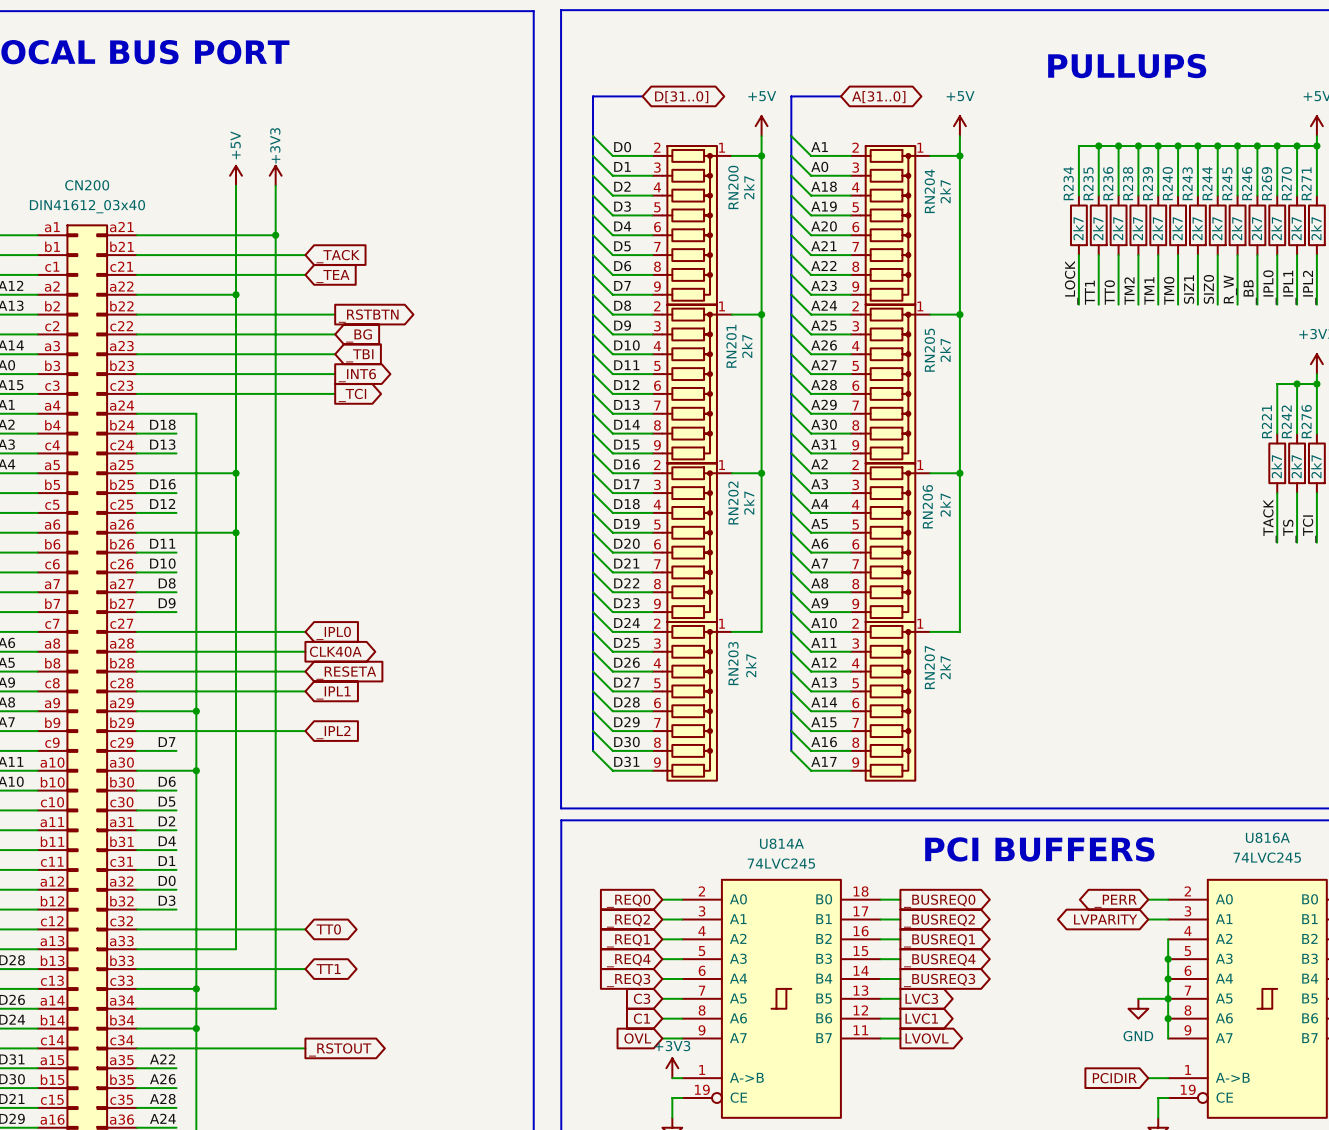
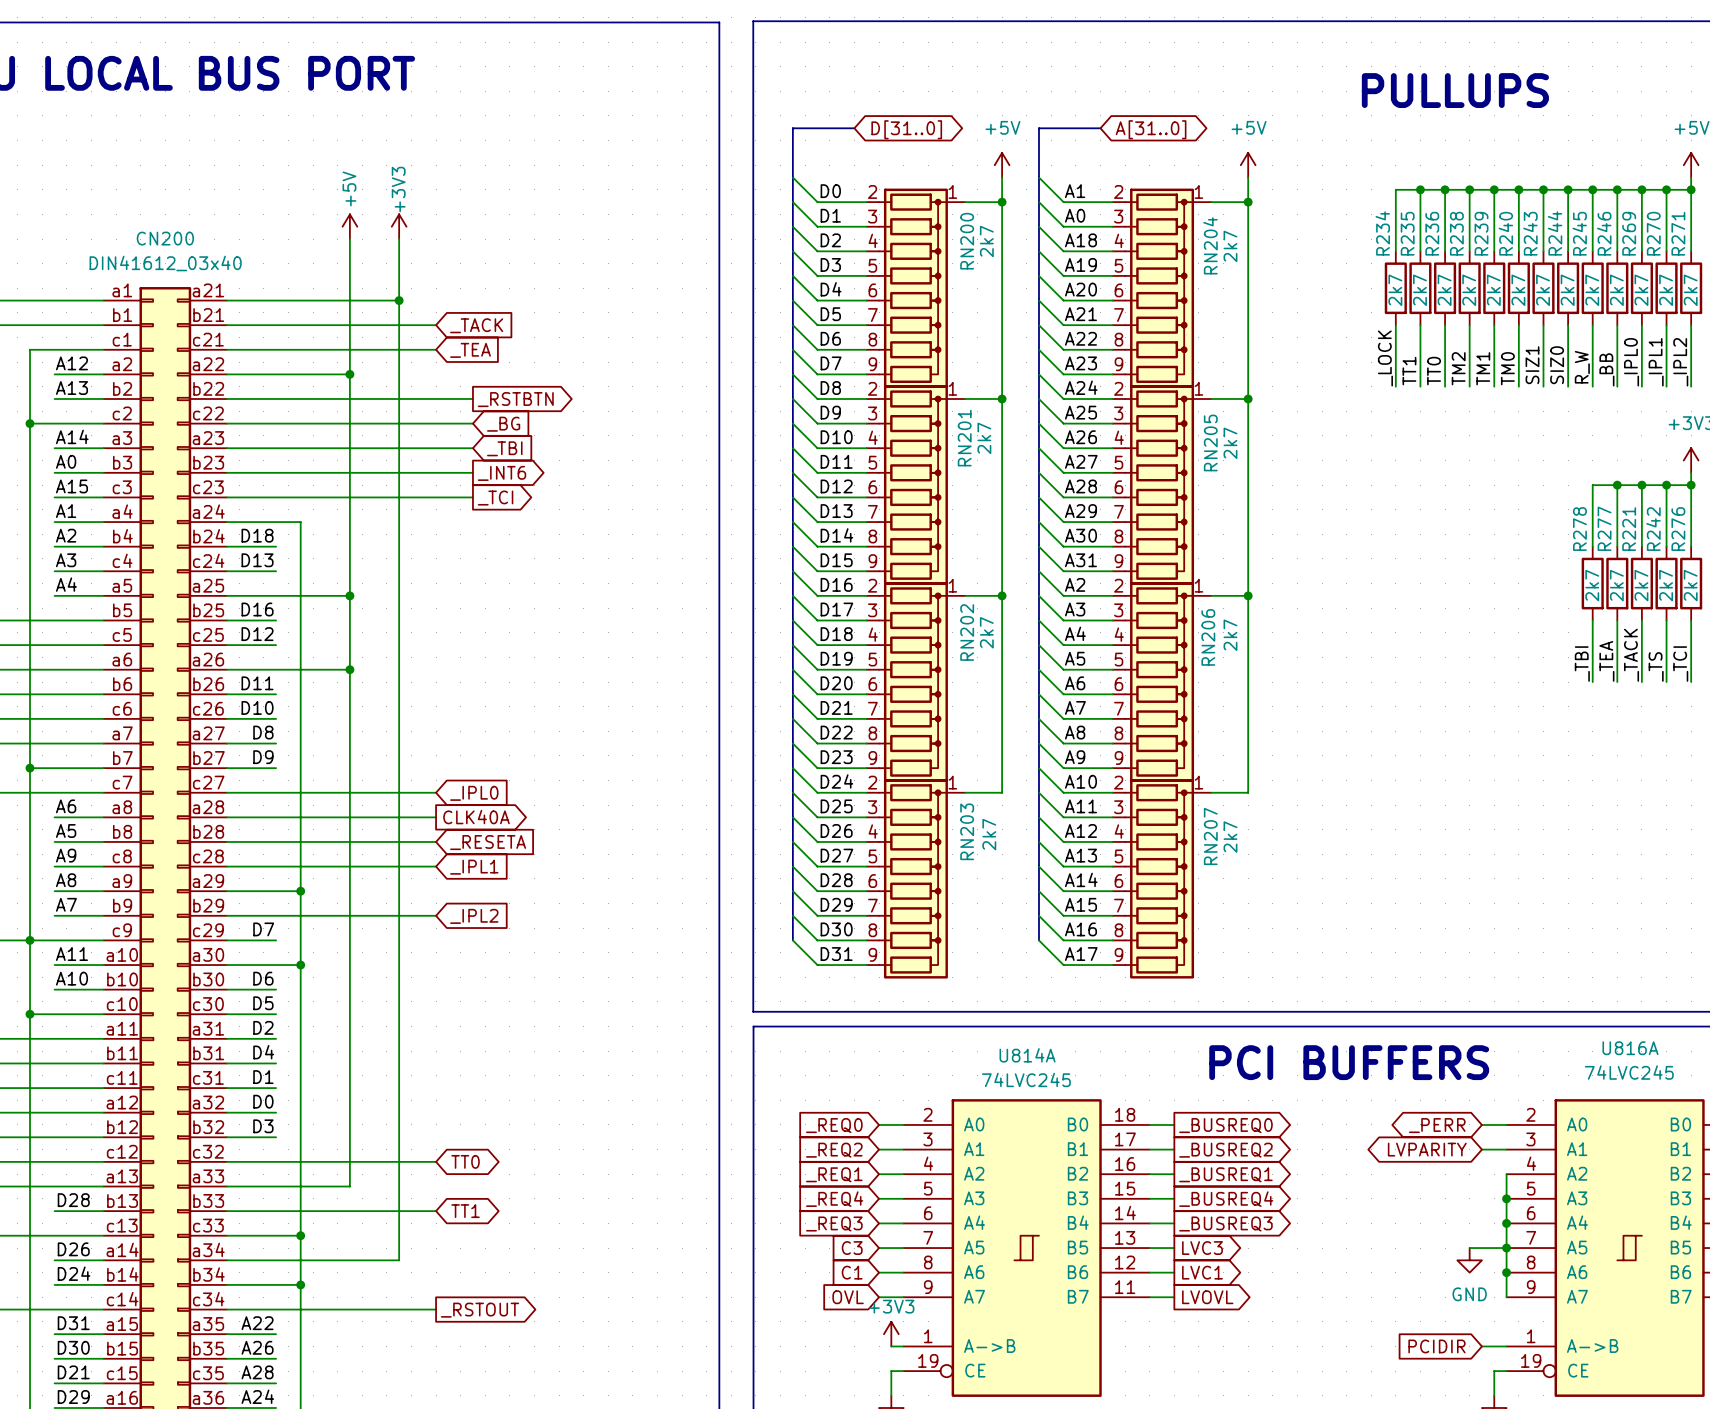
wire: none -> (1617, 485) (1617, 546)
junction: none -> (1617, 485)
wire: none -> (1641, 485) (1592, 485) (1592, 546)
junction: none -> (1641, 485)
R278: none -> 2k7 (1592, 583)
R277: none -> 2k7 (1617, 583)
wire: none -> (1592, 620) (1592, 682)
wire: none -> (1617, 620) (1617, 682)
label: none -> _TEA (1606, 661)
label: none -> _TBI (1582, 664)

